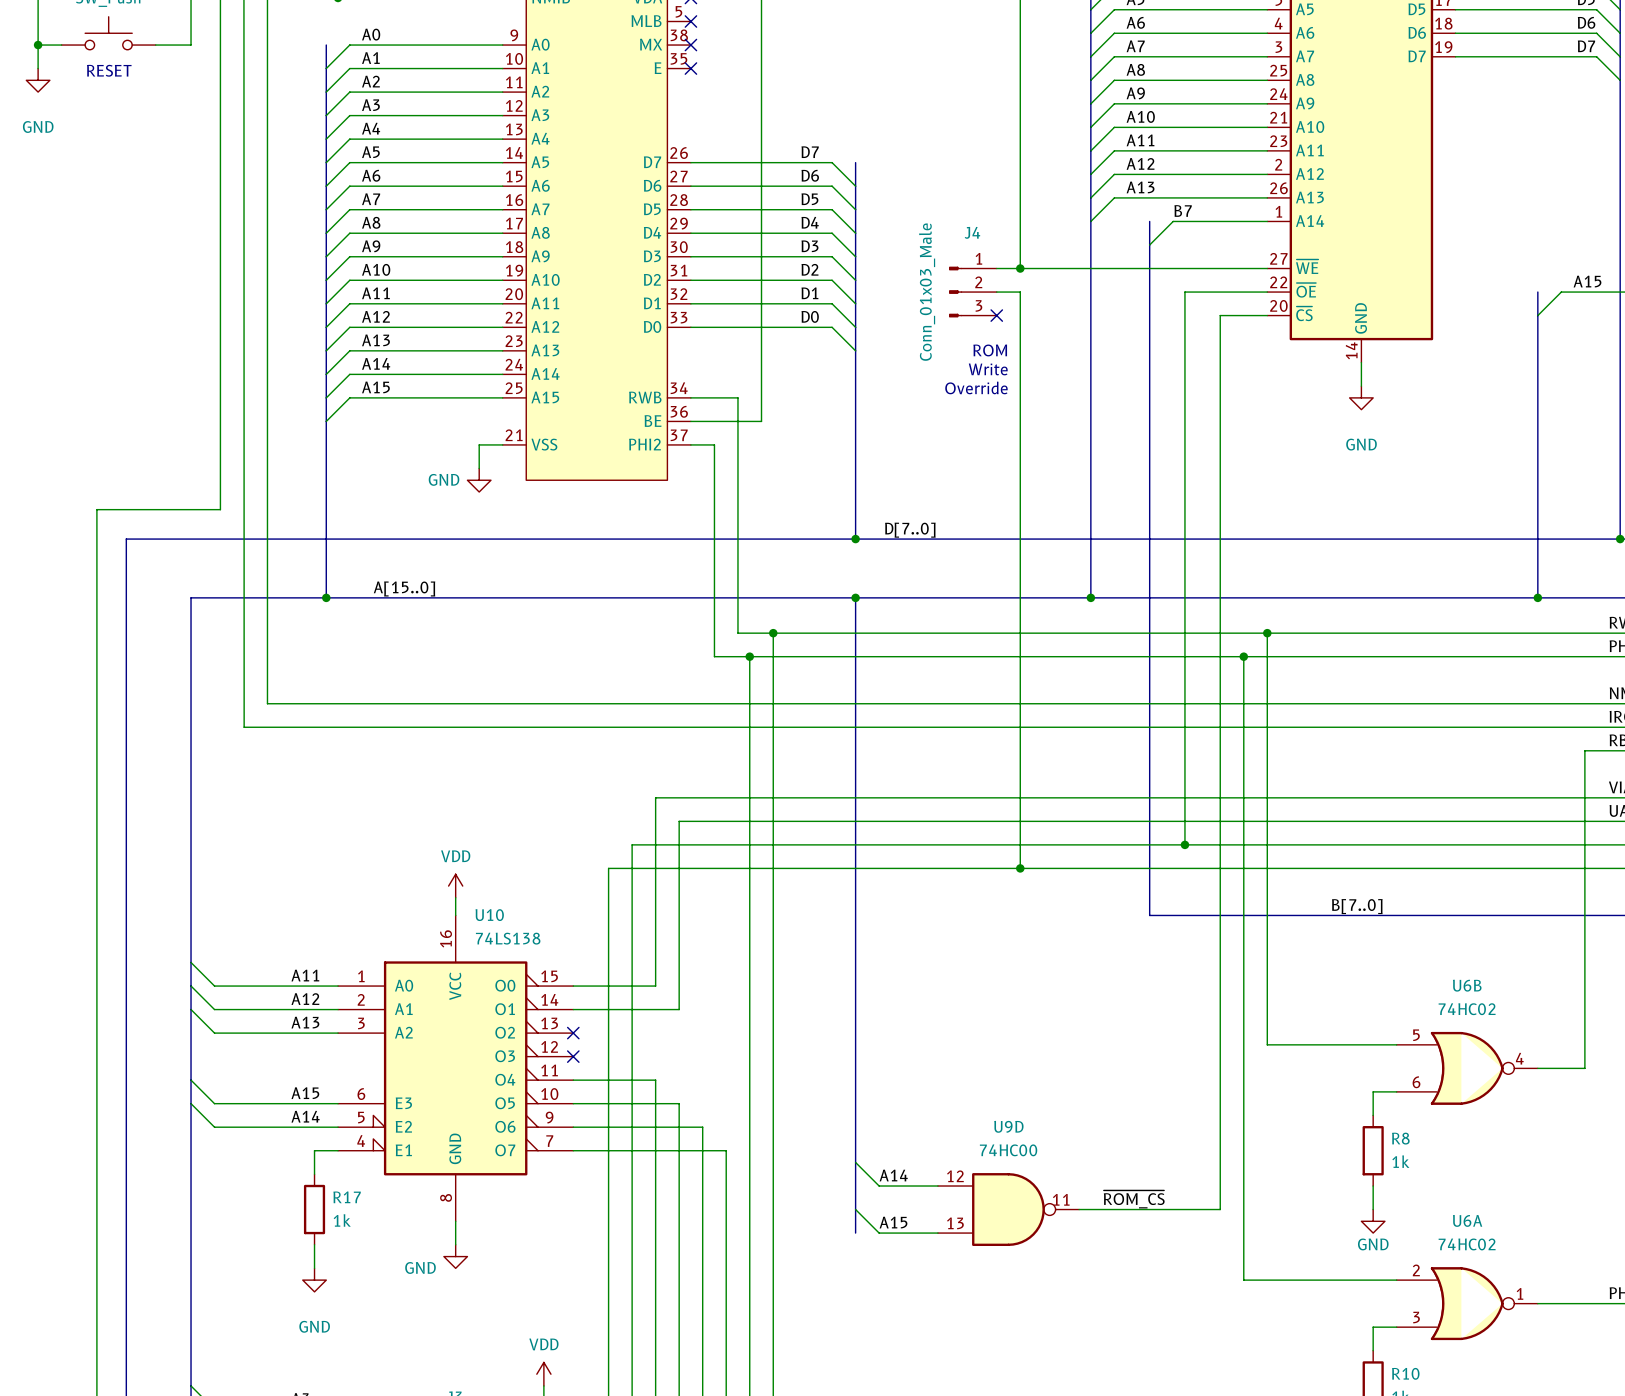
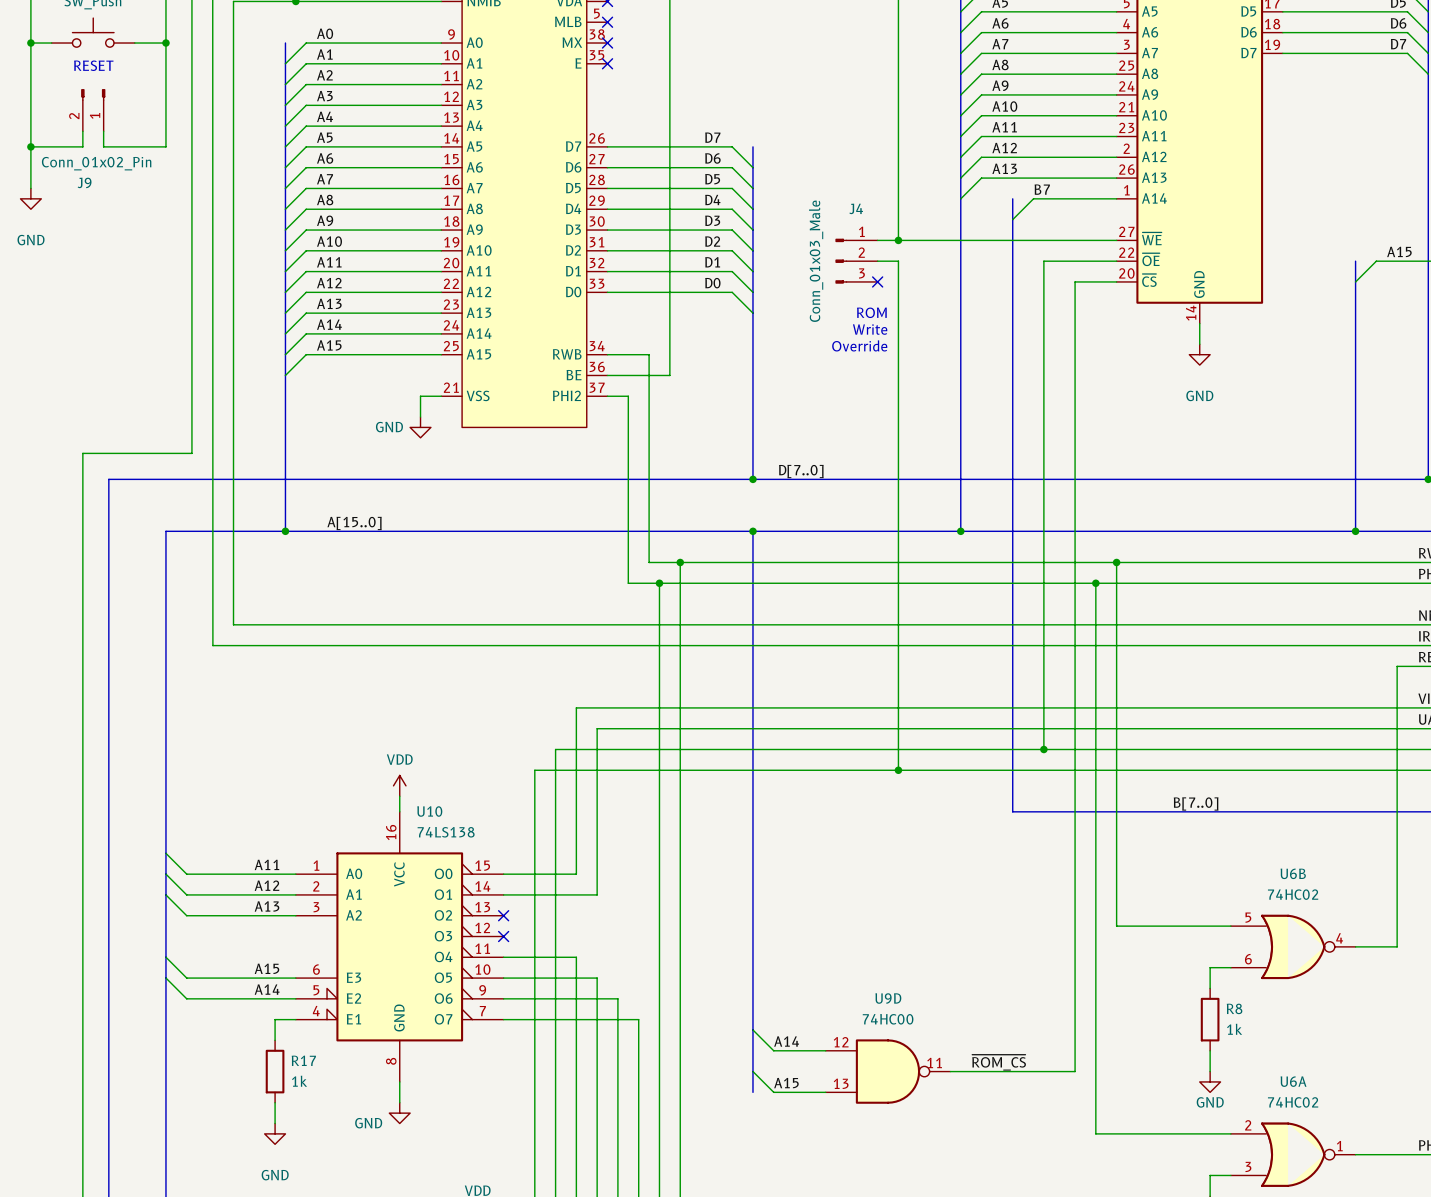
wire: none -> (165, 43) (165, 146) (103, 146) (103, 131)
junction: none -> (165, 43)
wire: none -> (30, 63) (30, 188)
power symbol position: GND (38, 80) -> GND (30, 198)
J9: none -> Conn_01x02_Pin (93, 110)
wire: none -> (82, 131) (82, 146) (30, 146)
junction: none -> (30, 146)

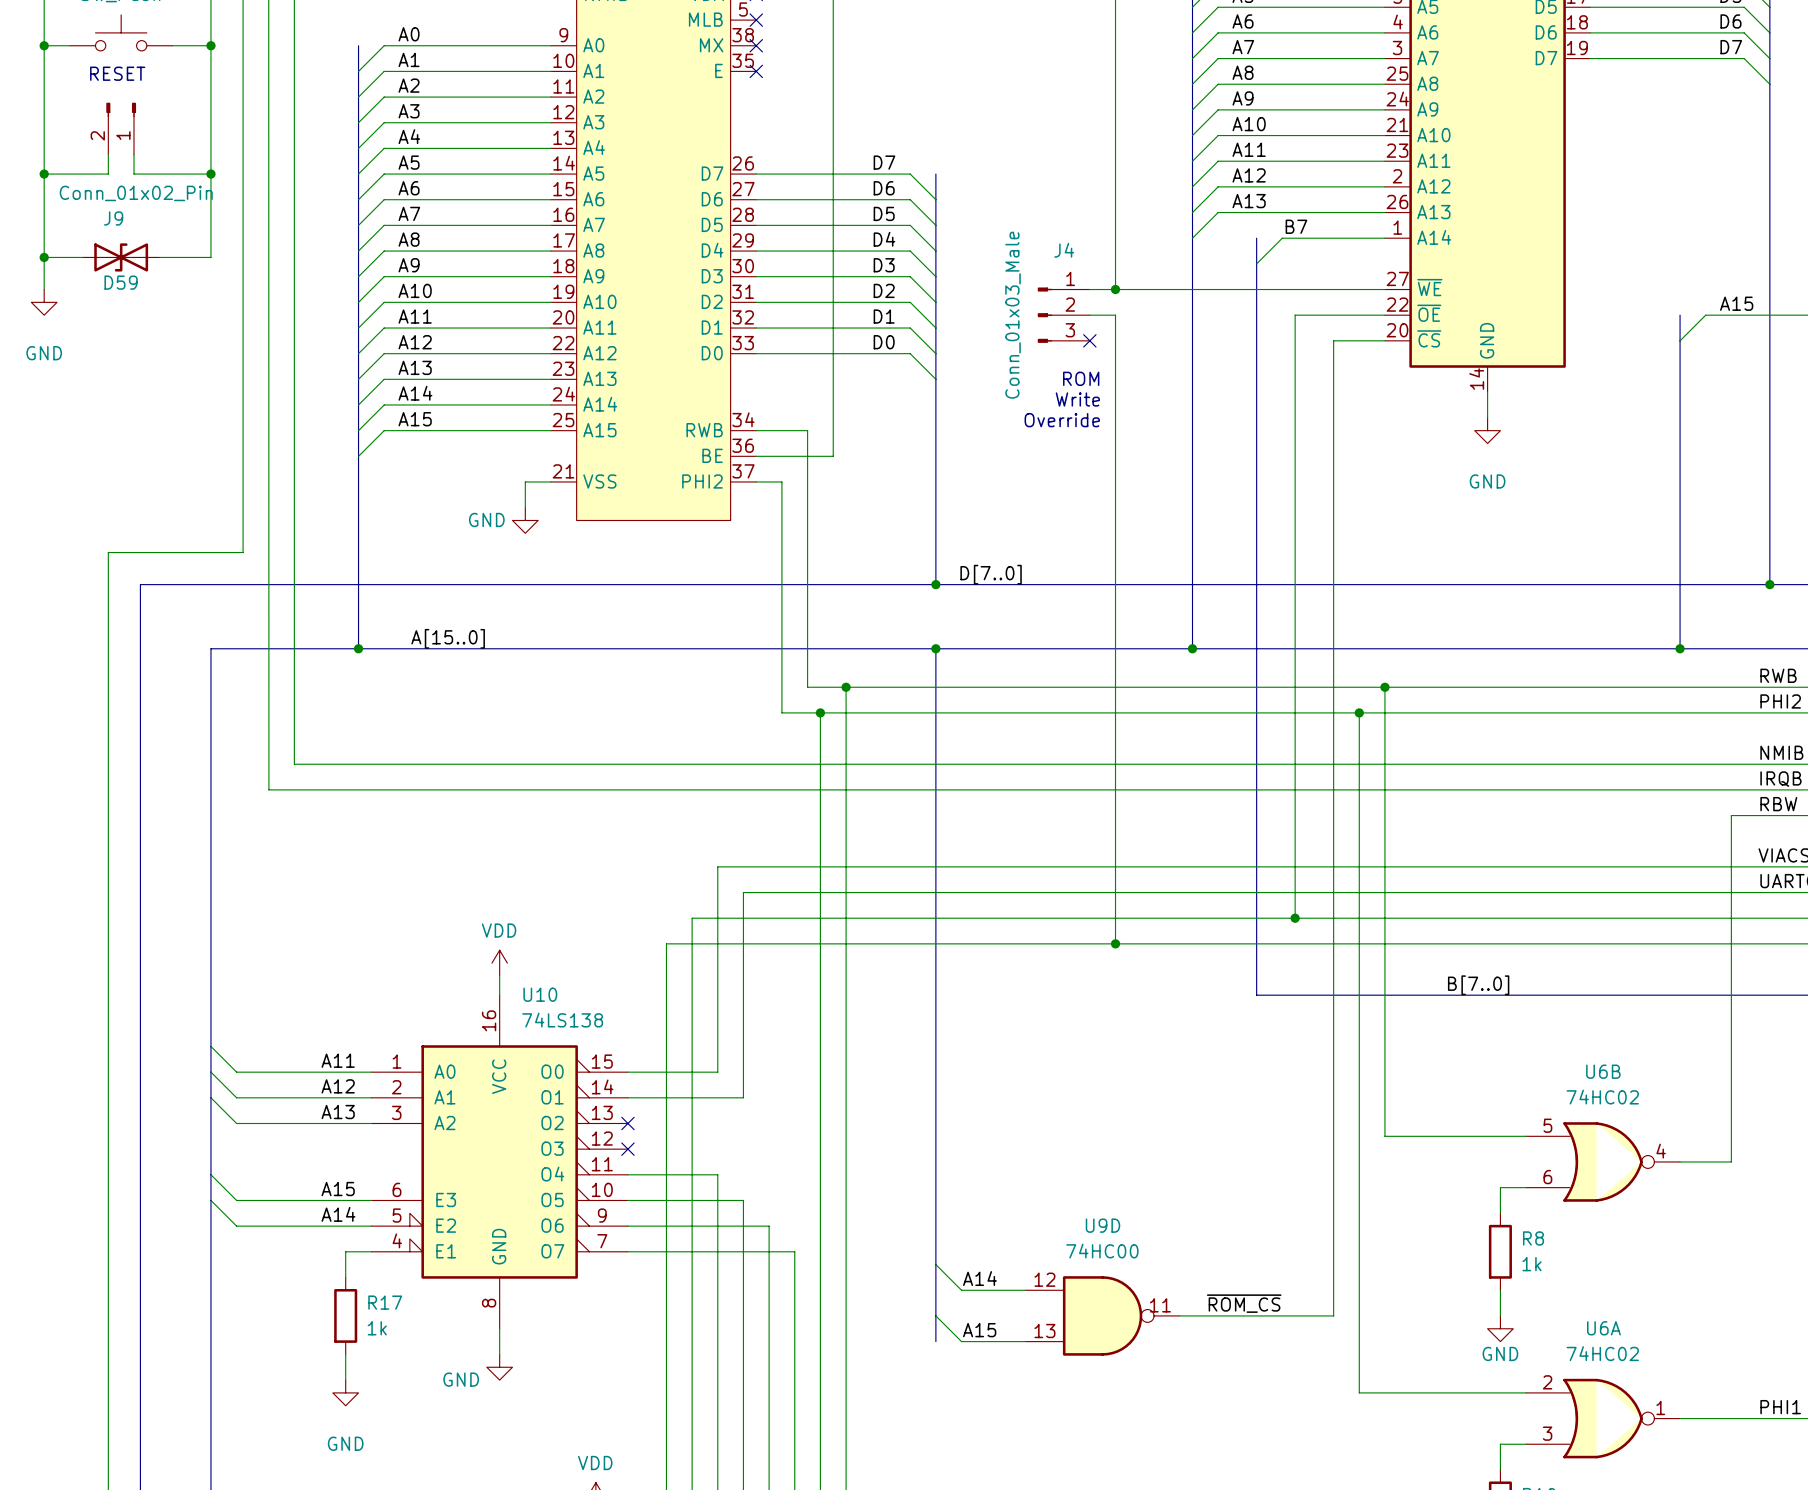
wire: none -> (210, 174) (210, 257) (159, 257)
junction: none -> (210, 174)
wire: none -> (44, 225) (44, 289)
power symbol position: GND (30, 198) -> GND (44, 302)
wire: none -> (44, 257) (82, 257)
junction: none -> (44, 257)
D59: none -> (121, 257)

